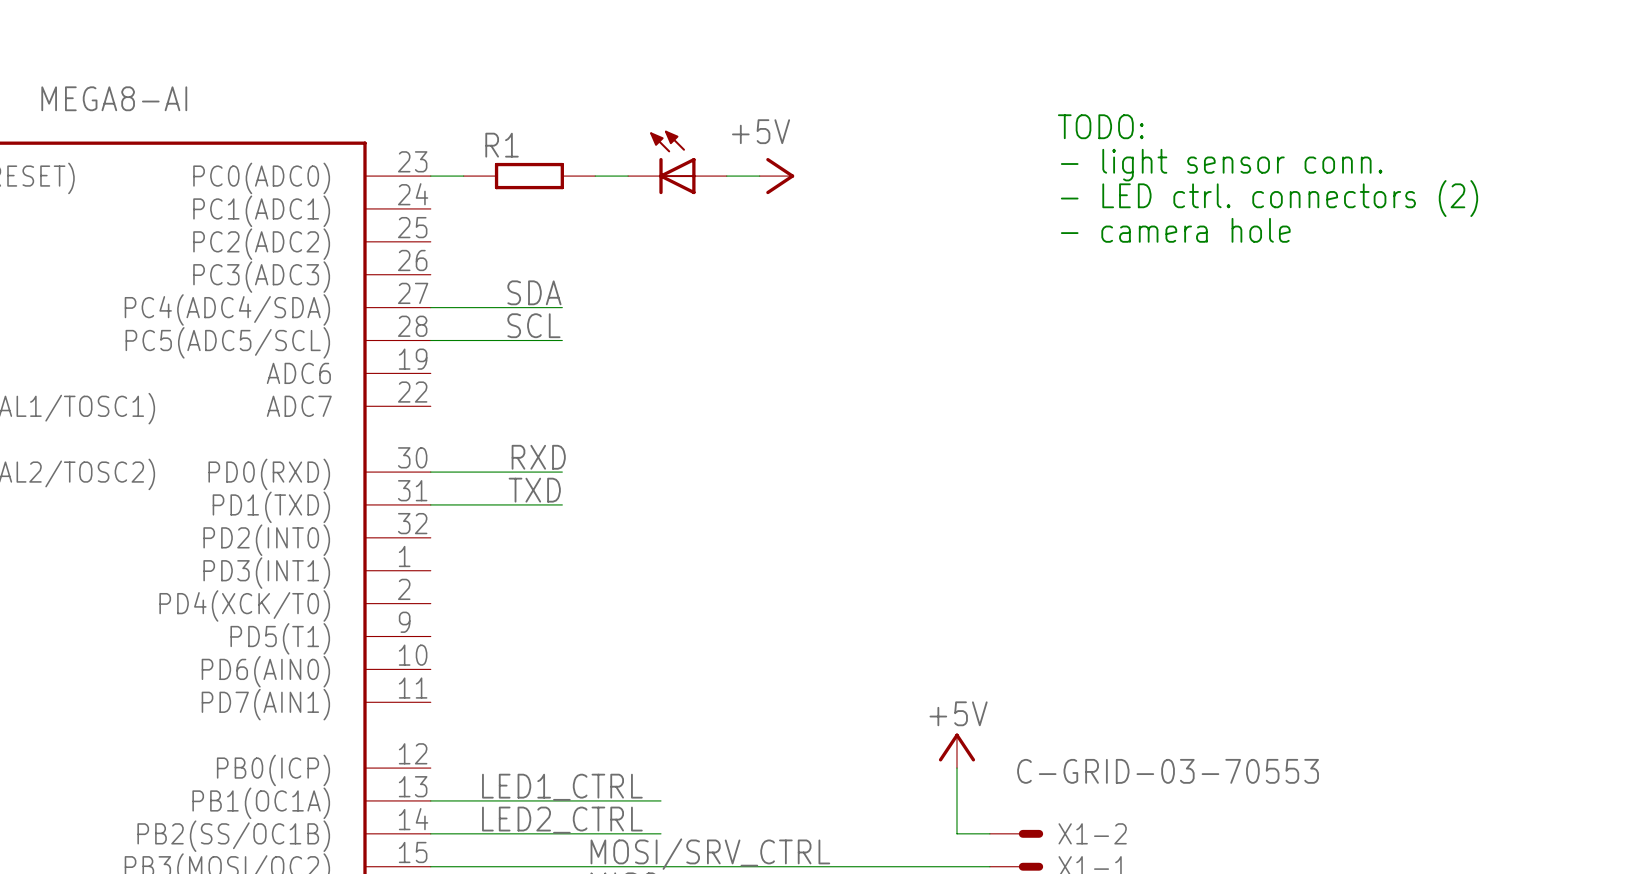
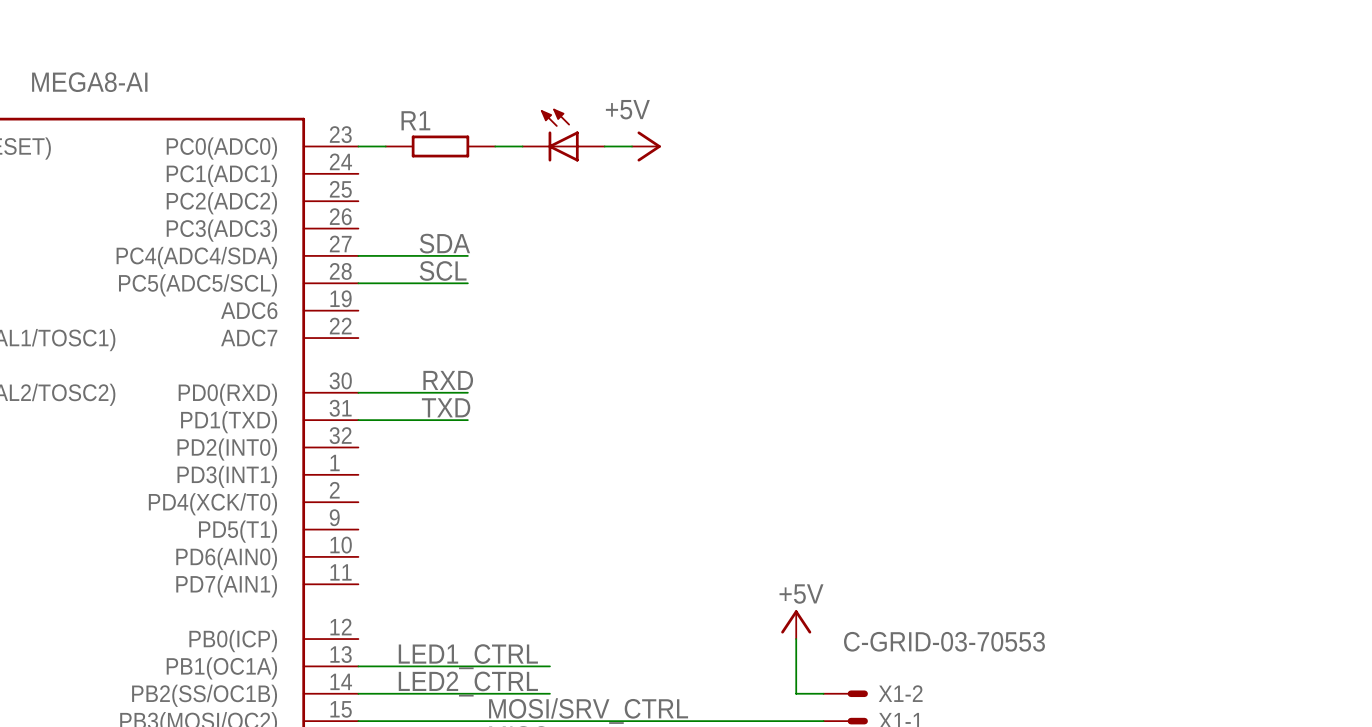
text: TODO: (1100, 126) -> none
text: - light sensor conn. (1221, 165) -> none
text: - LED ctrl. connectors (2) (1269, 198) -> none
text: - camera hole (1175, 230) -> none

